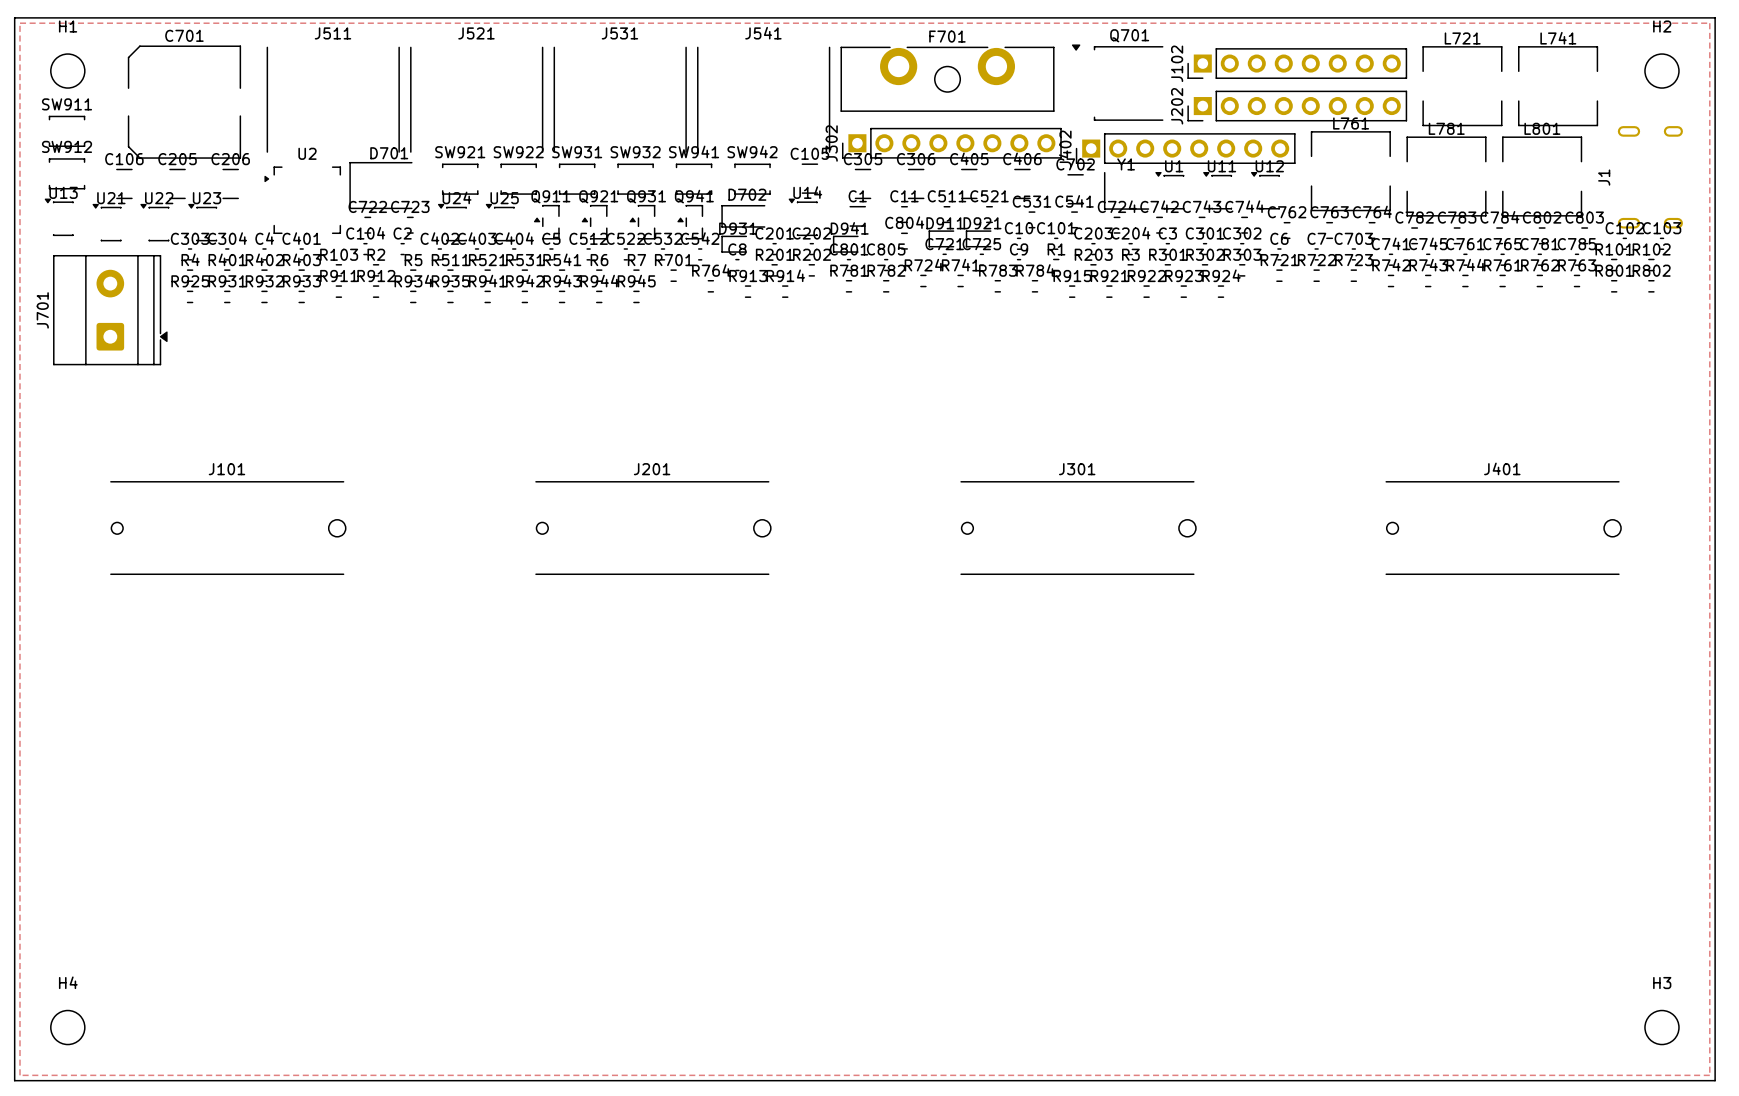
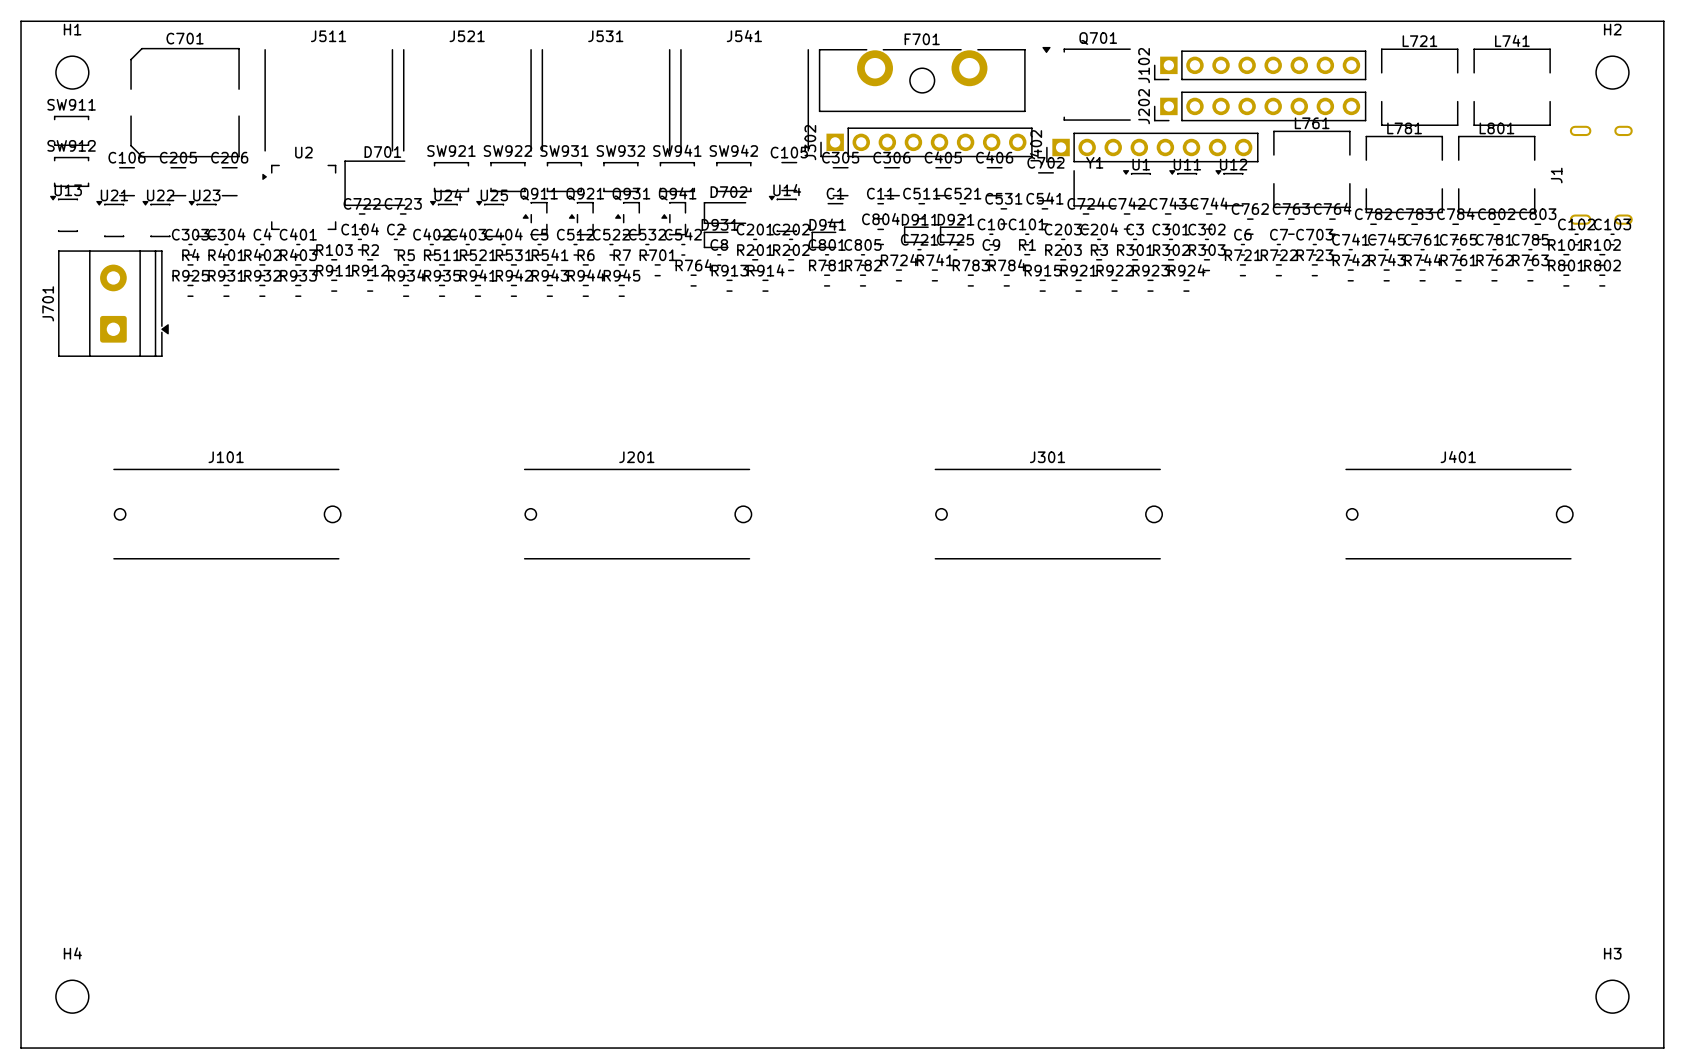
zone outline: (19, 23) (1709, 23) (1709, 1075) (19, 1075) (19, 23) -> none

